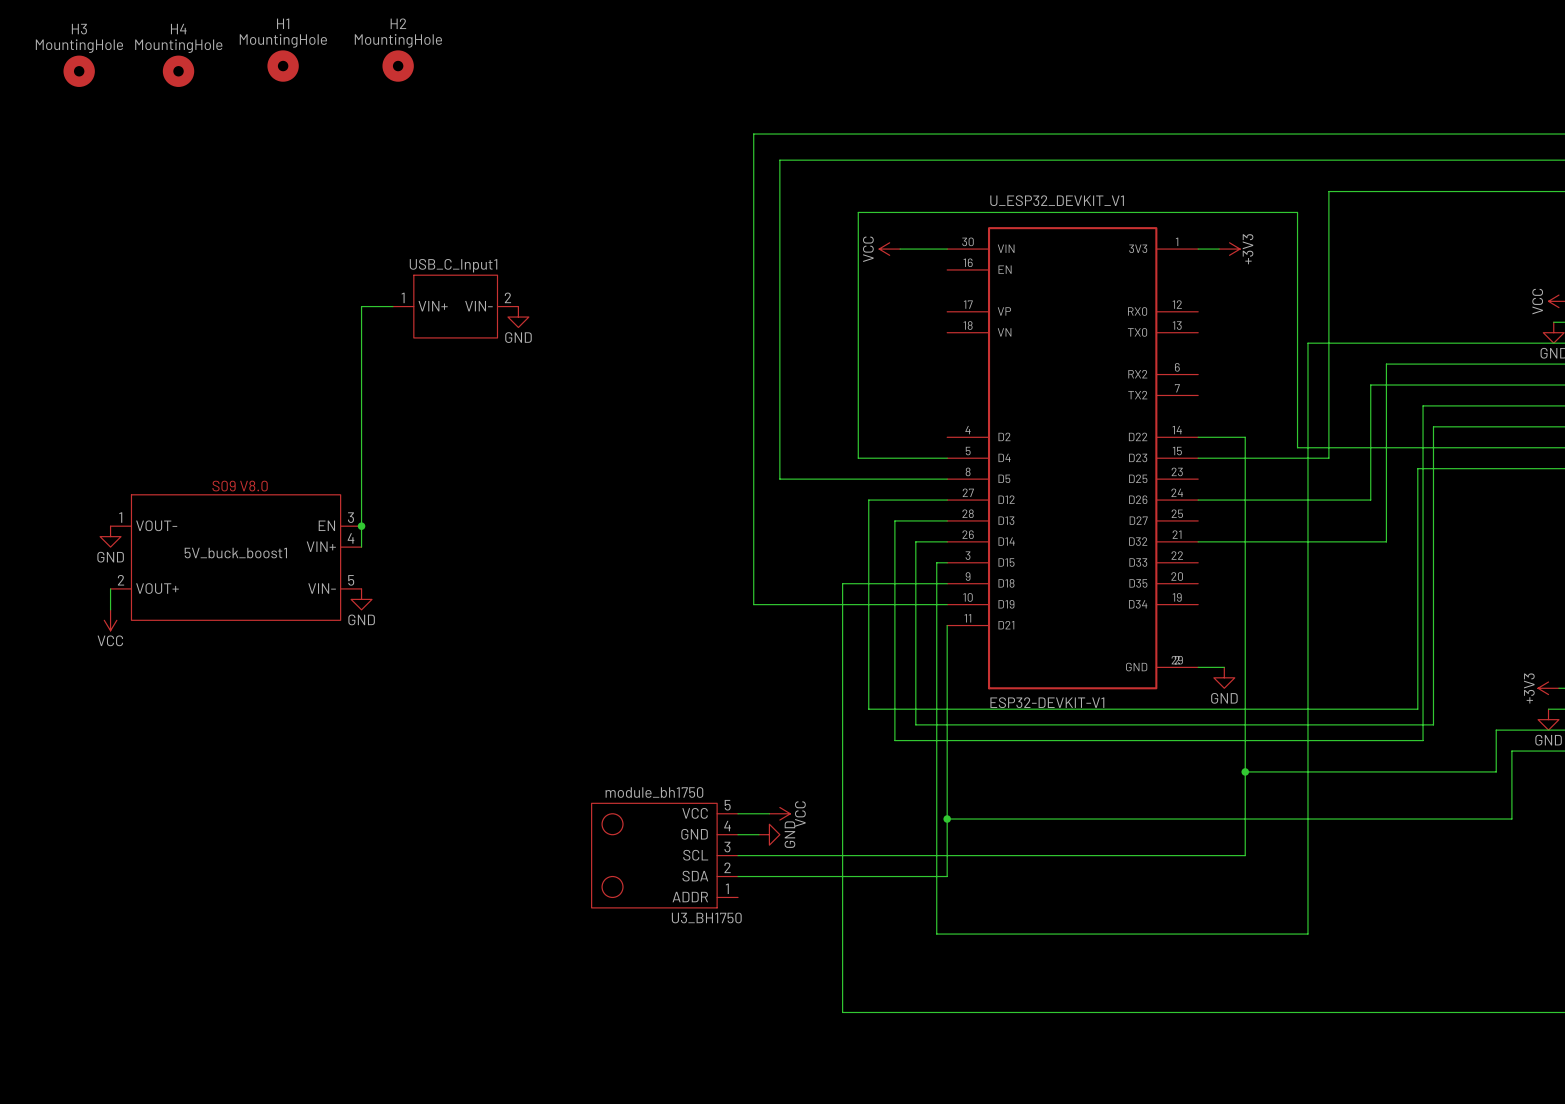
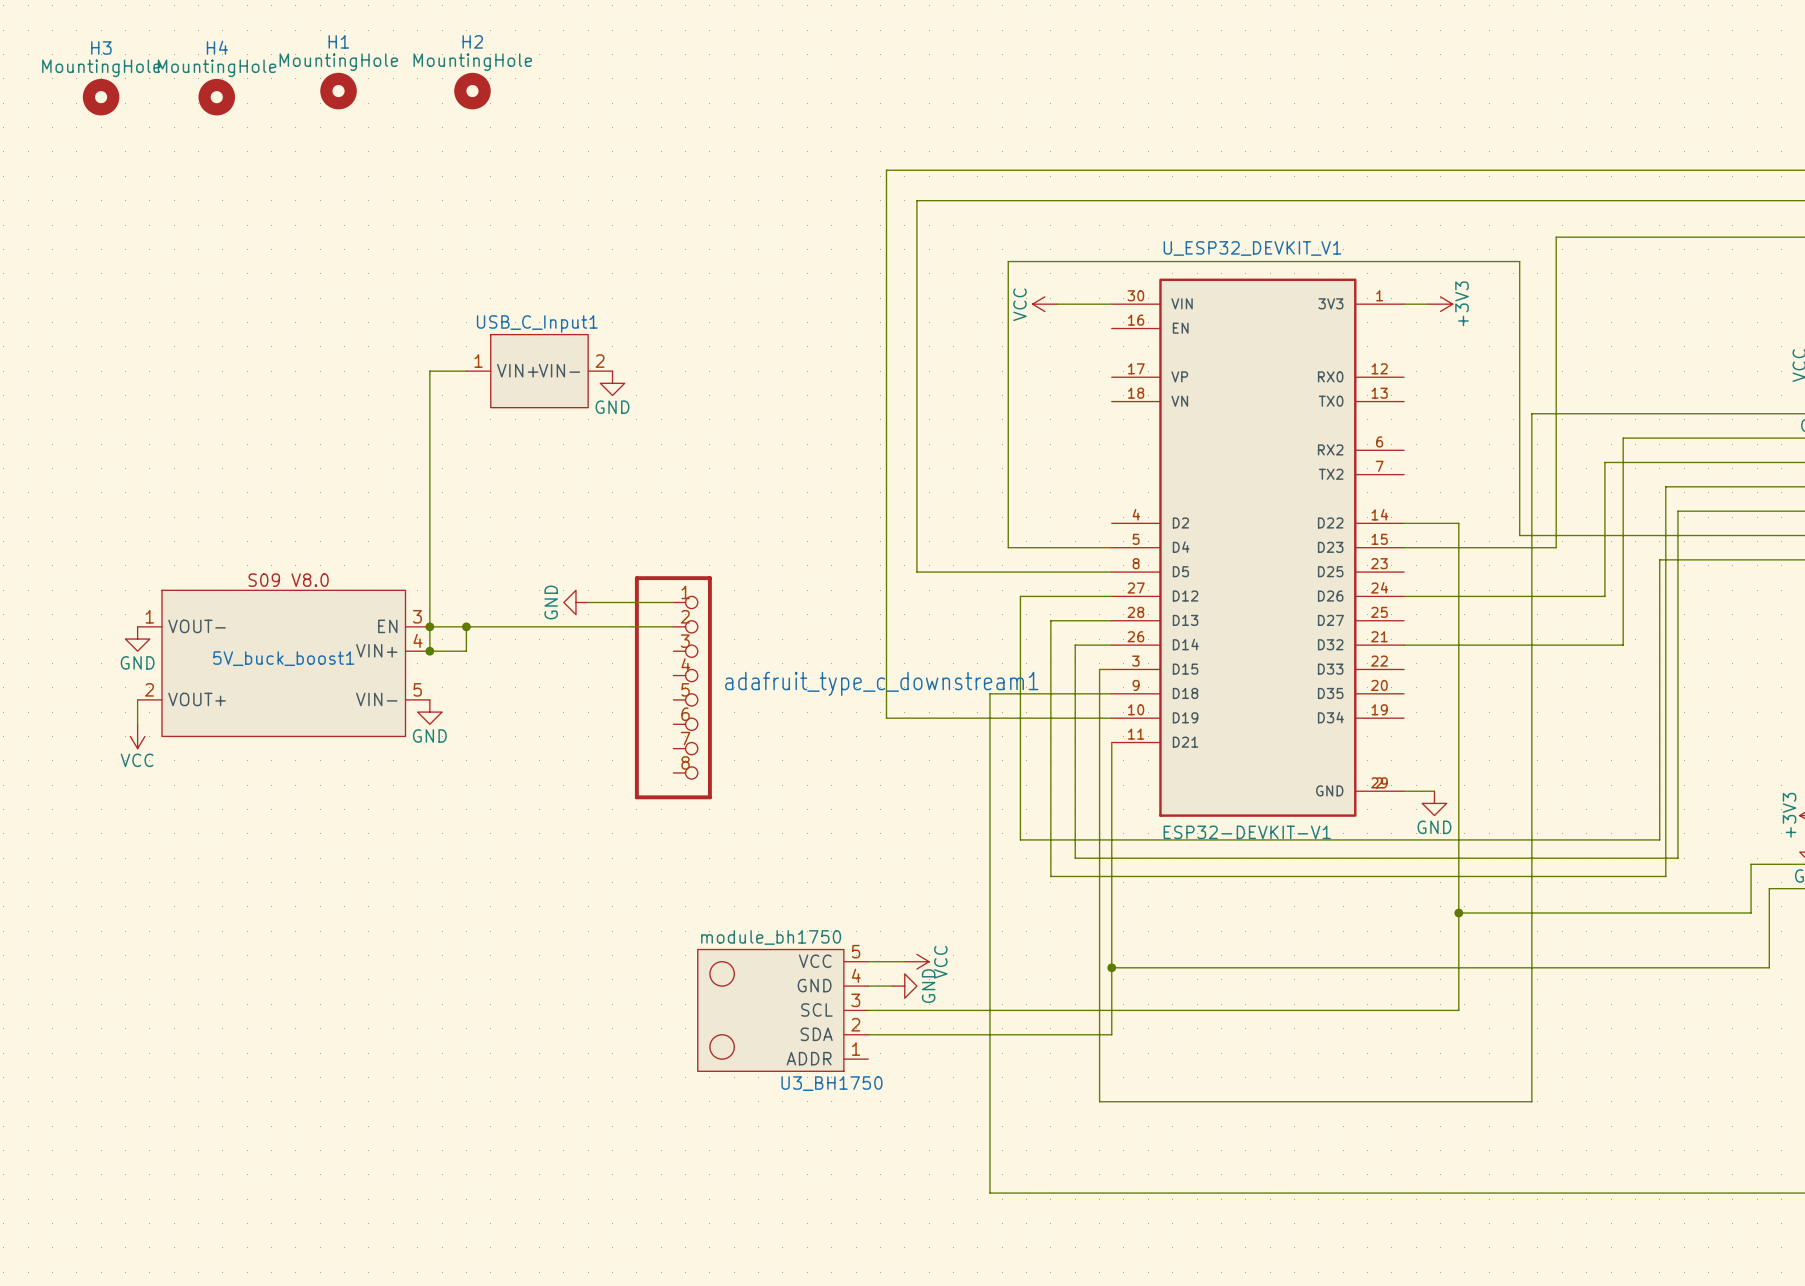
power symbol: none -> GND (575, 602)
wire: none -> (588, 602) (673, 602)
wire: none -> (429, 626) (673, 626)
wire: none -> (466, 626) (466, 651) (429, 651)
junction: none -> (466, 626)
junction: none -> (429, 651)
adafruit_type_c_downstream1: none -> (673, 687)

